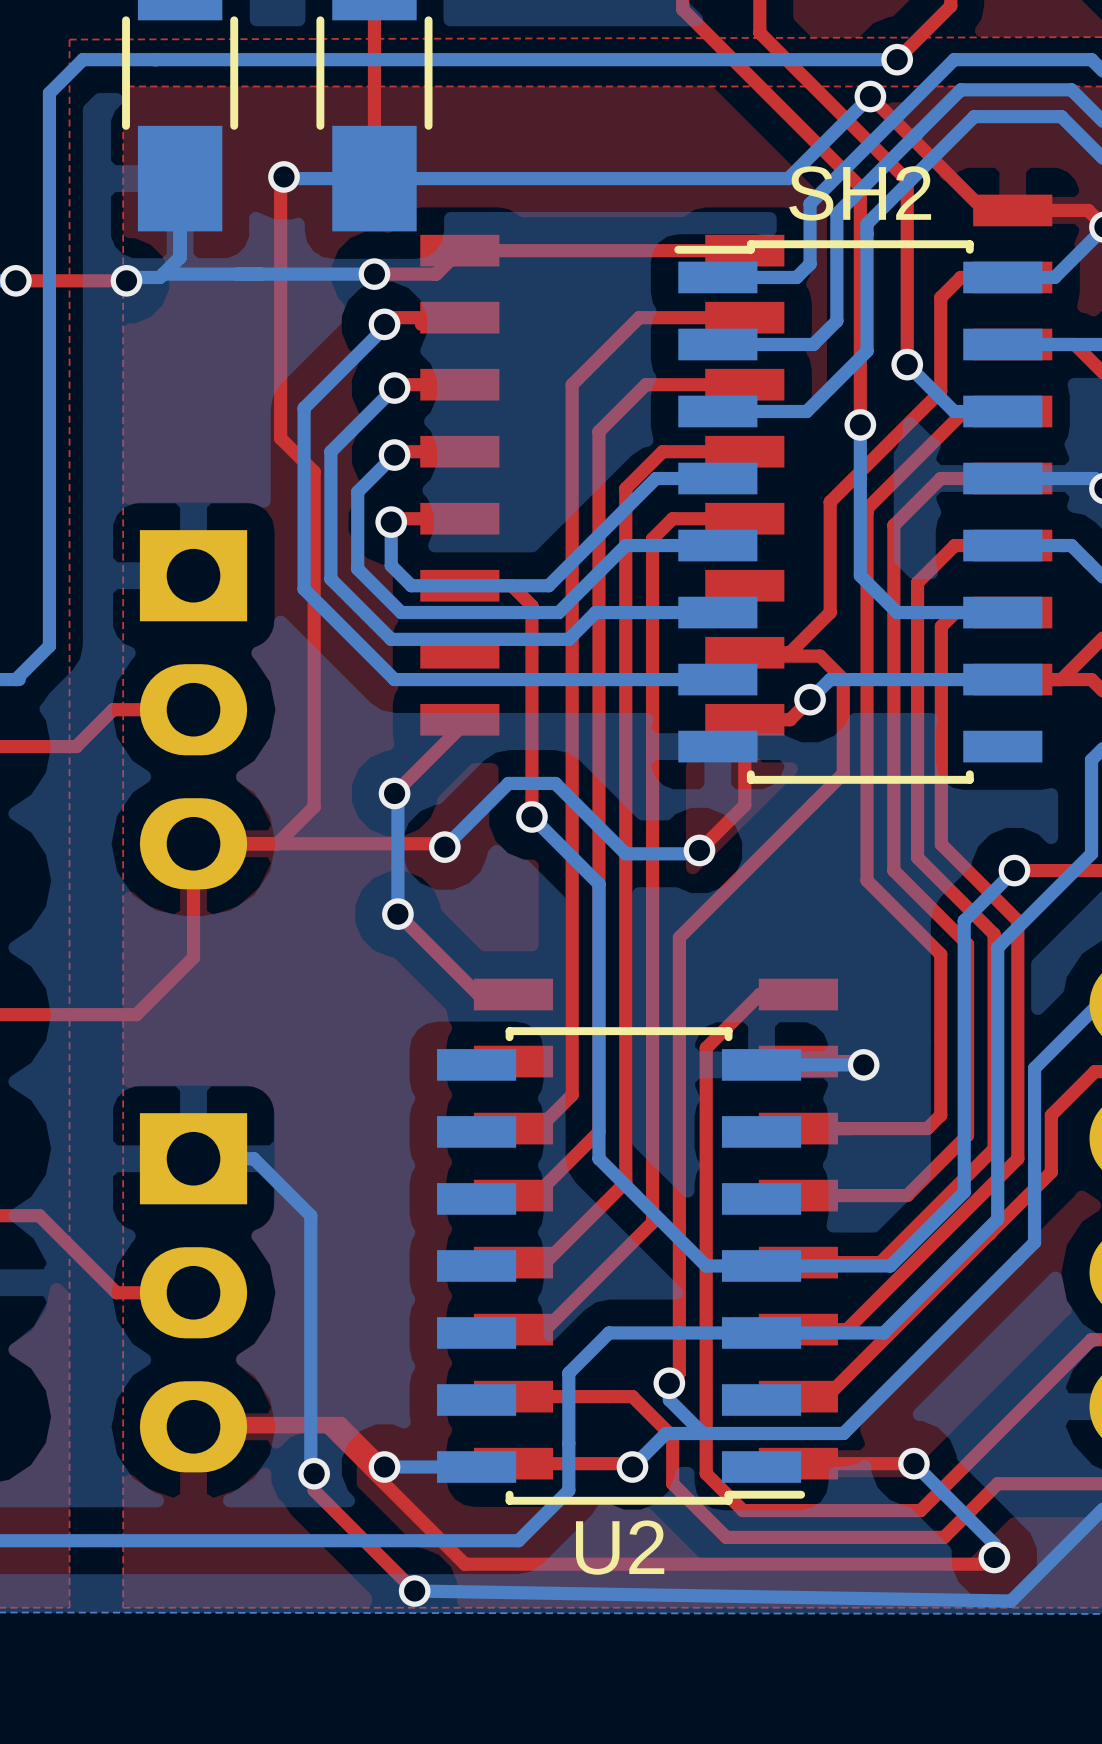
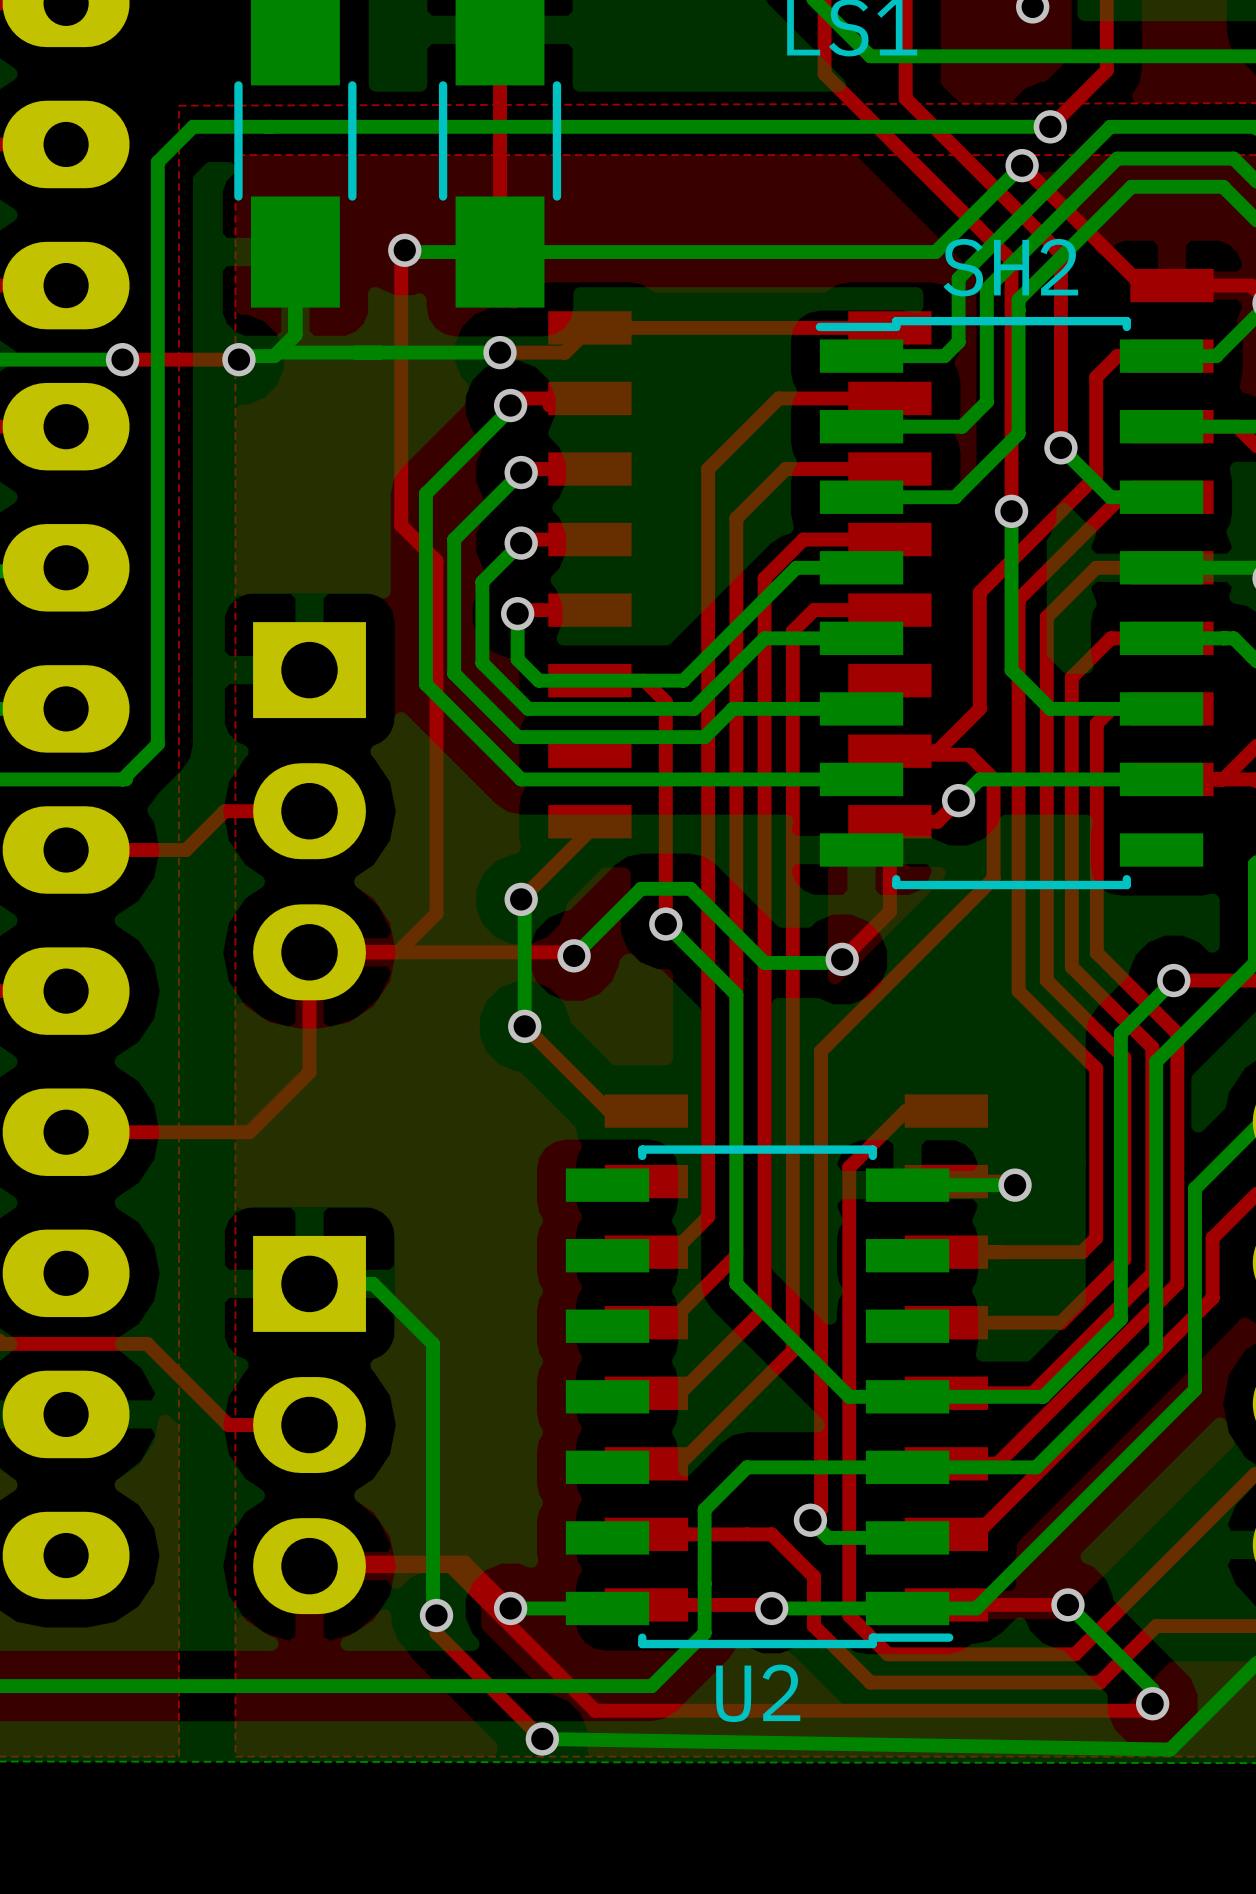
bottom track: (1034, 1242) (843, 1433) (665, 1433) (632, 1467) -> (1194, 1372) (1194, 1389) (976, 1608) (771, 1608)
bottom track: (669, 1383) (669, 1399) (702, 1433) -> (810, 1520) (828, 1537) (904, 1537)

